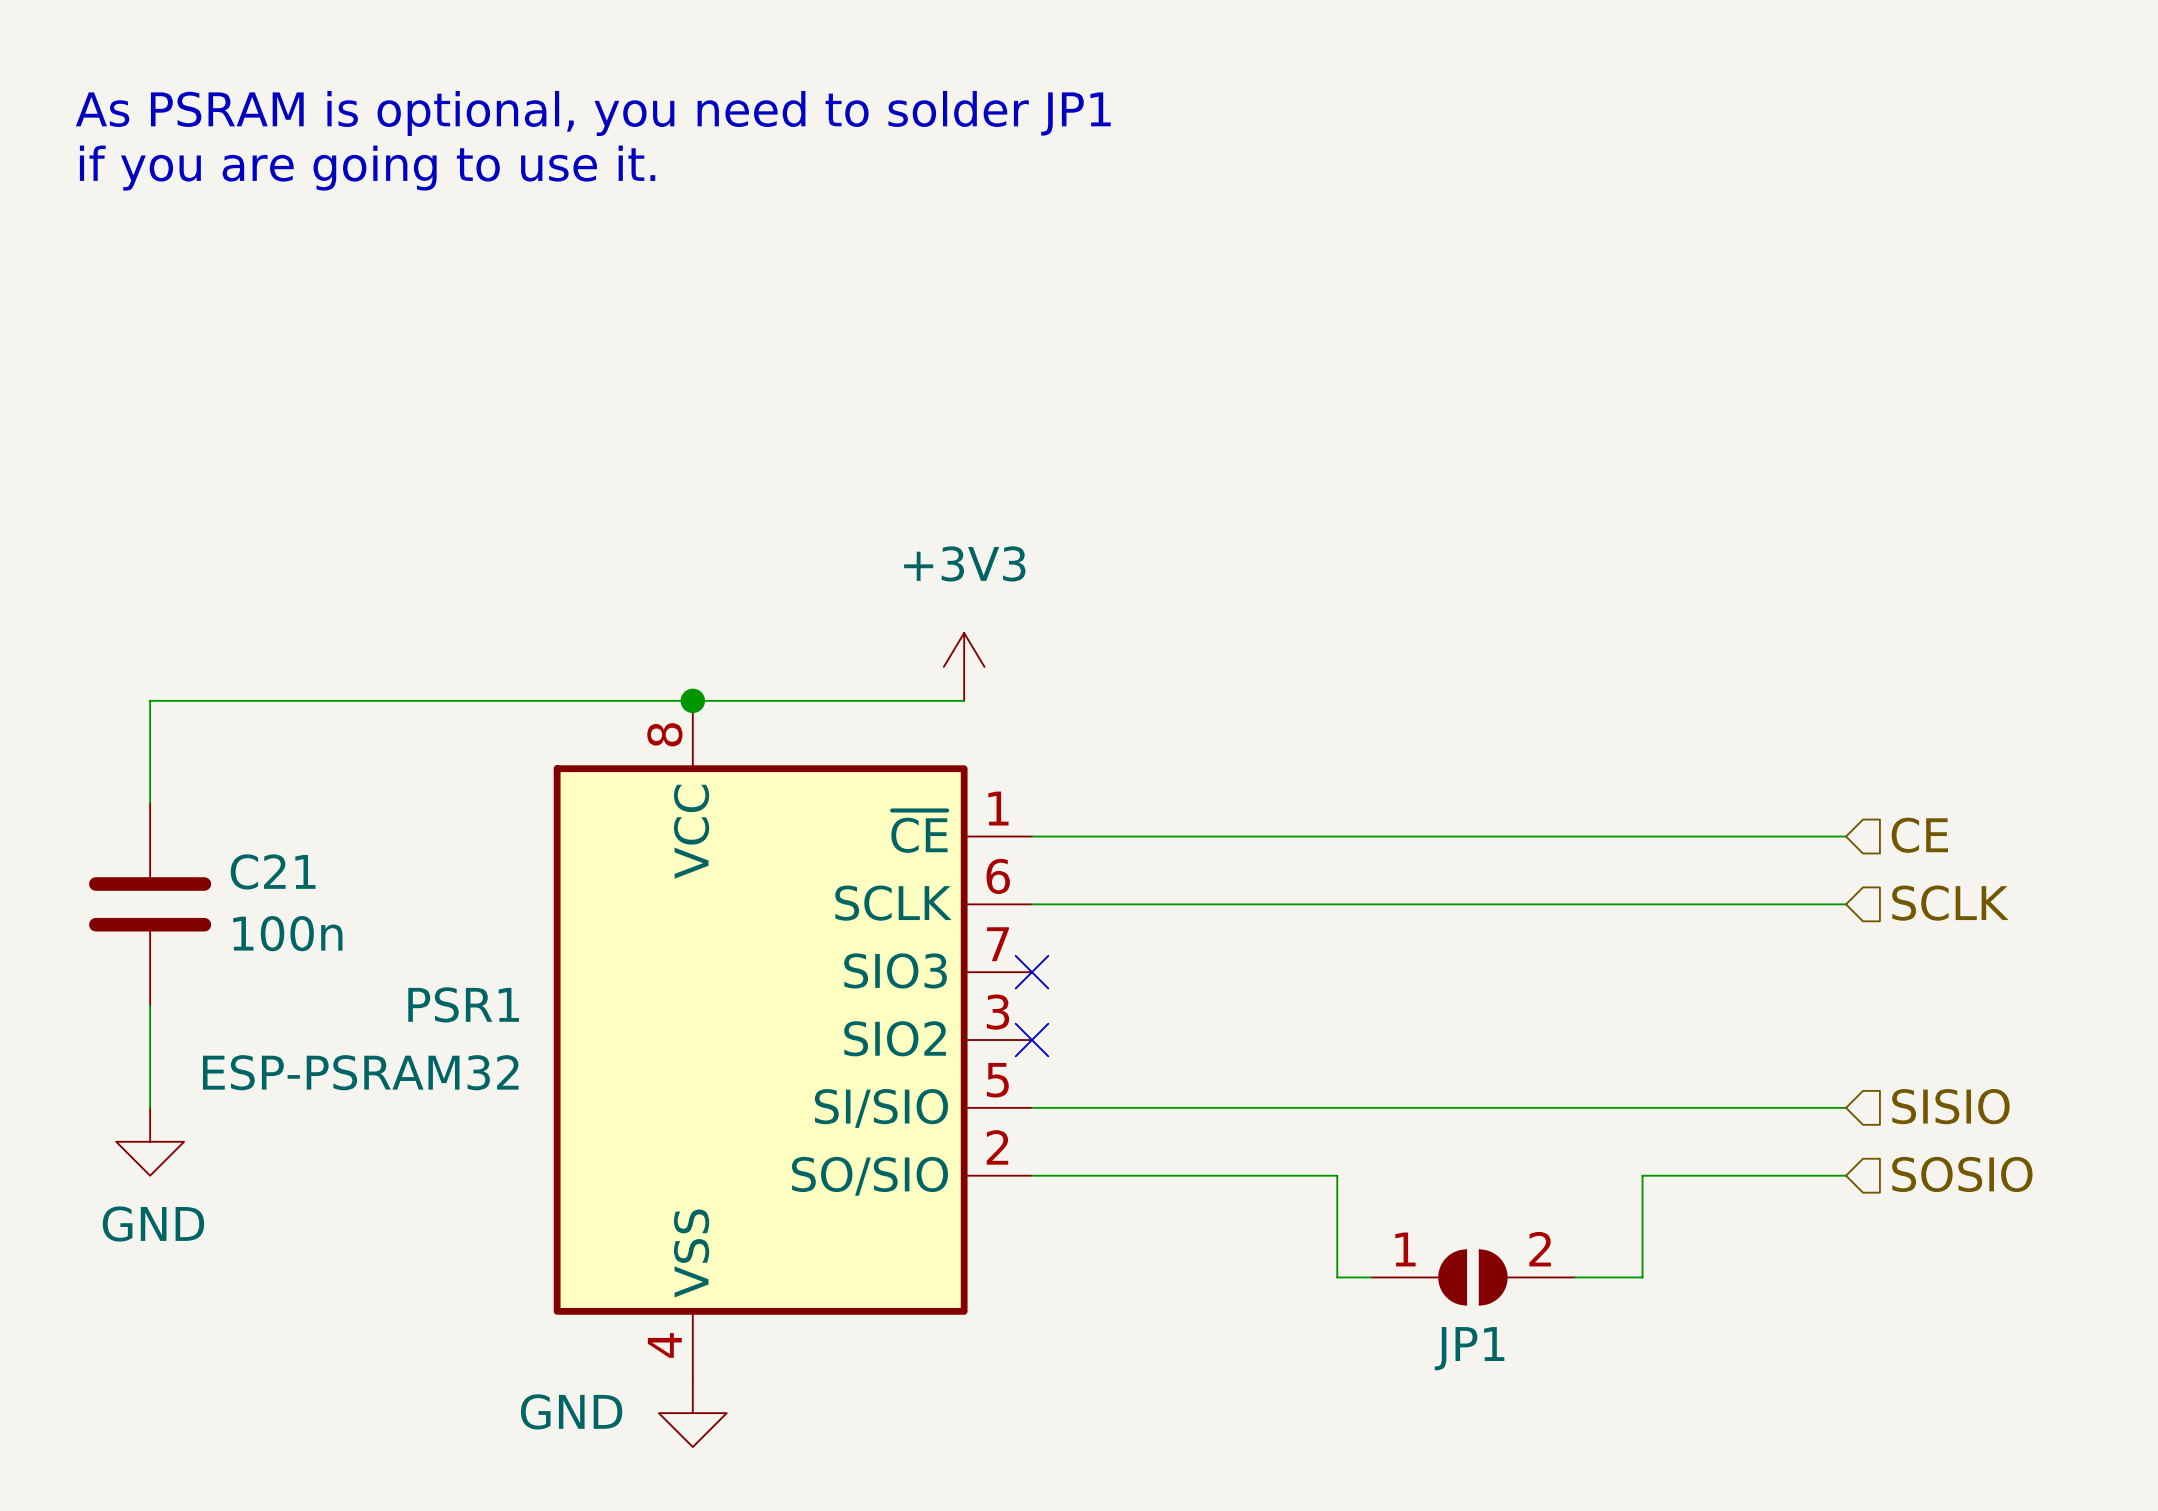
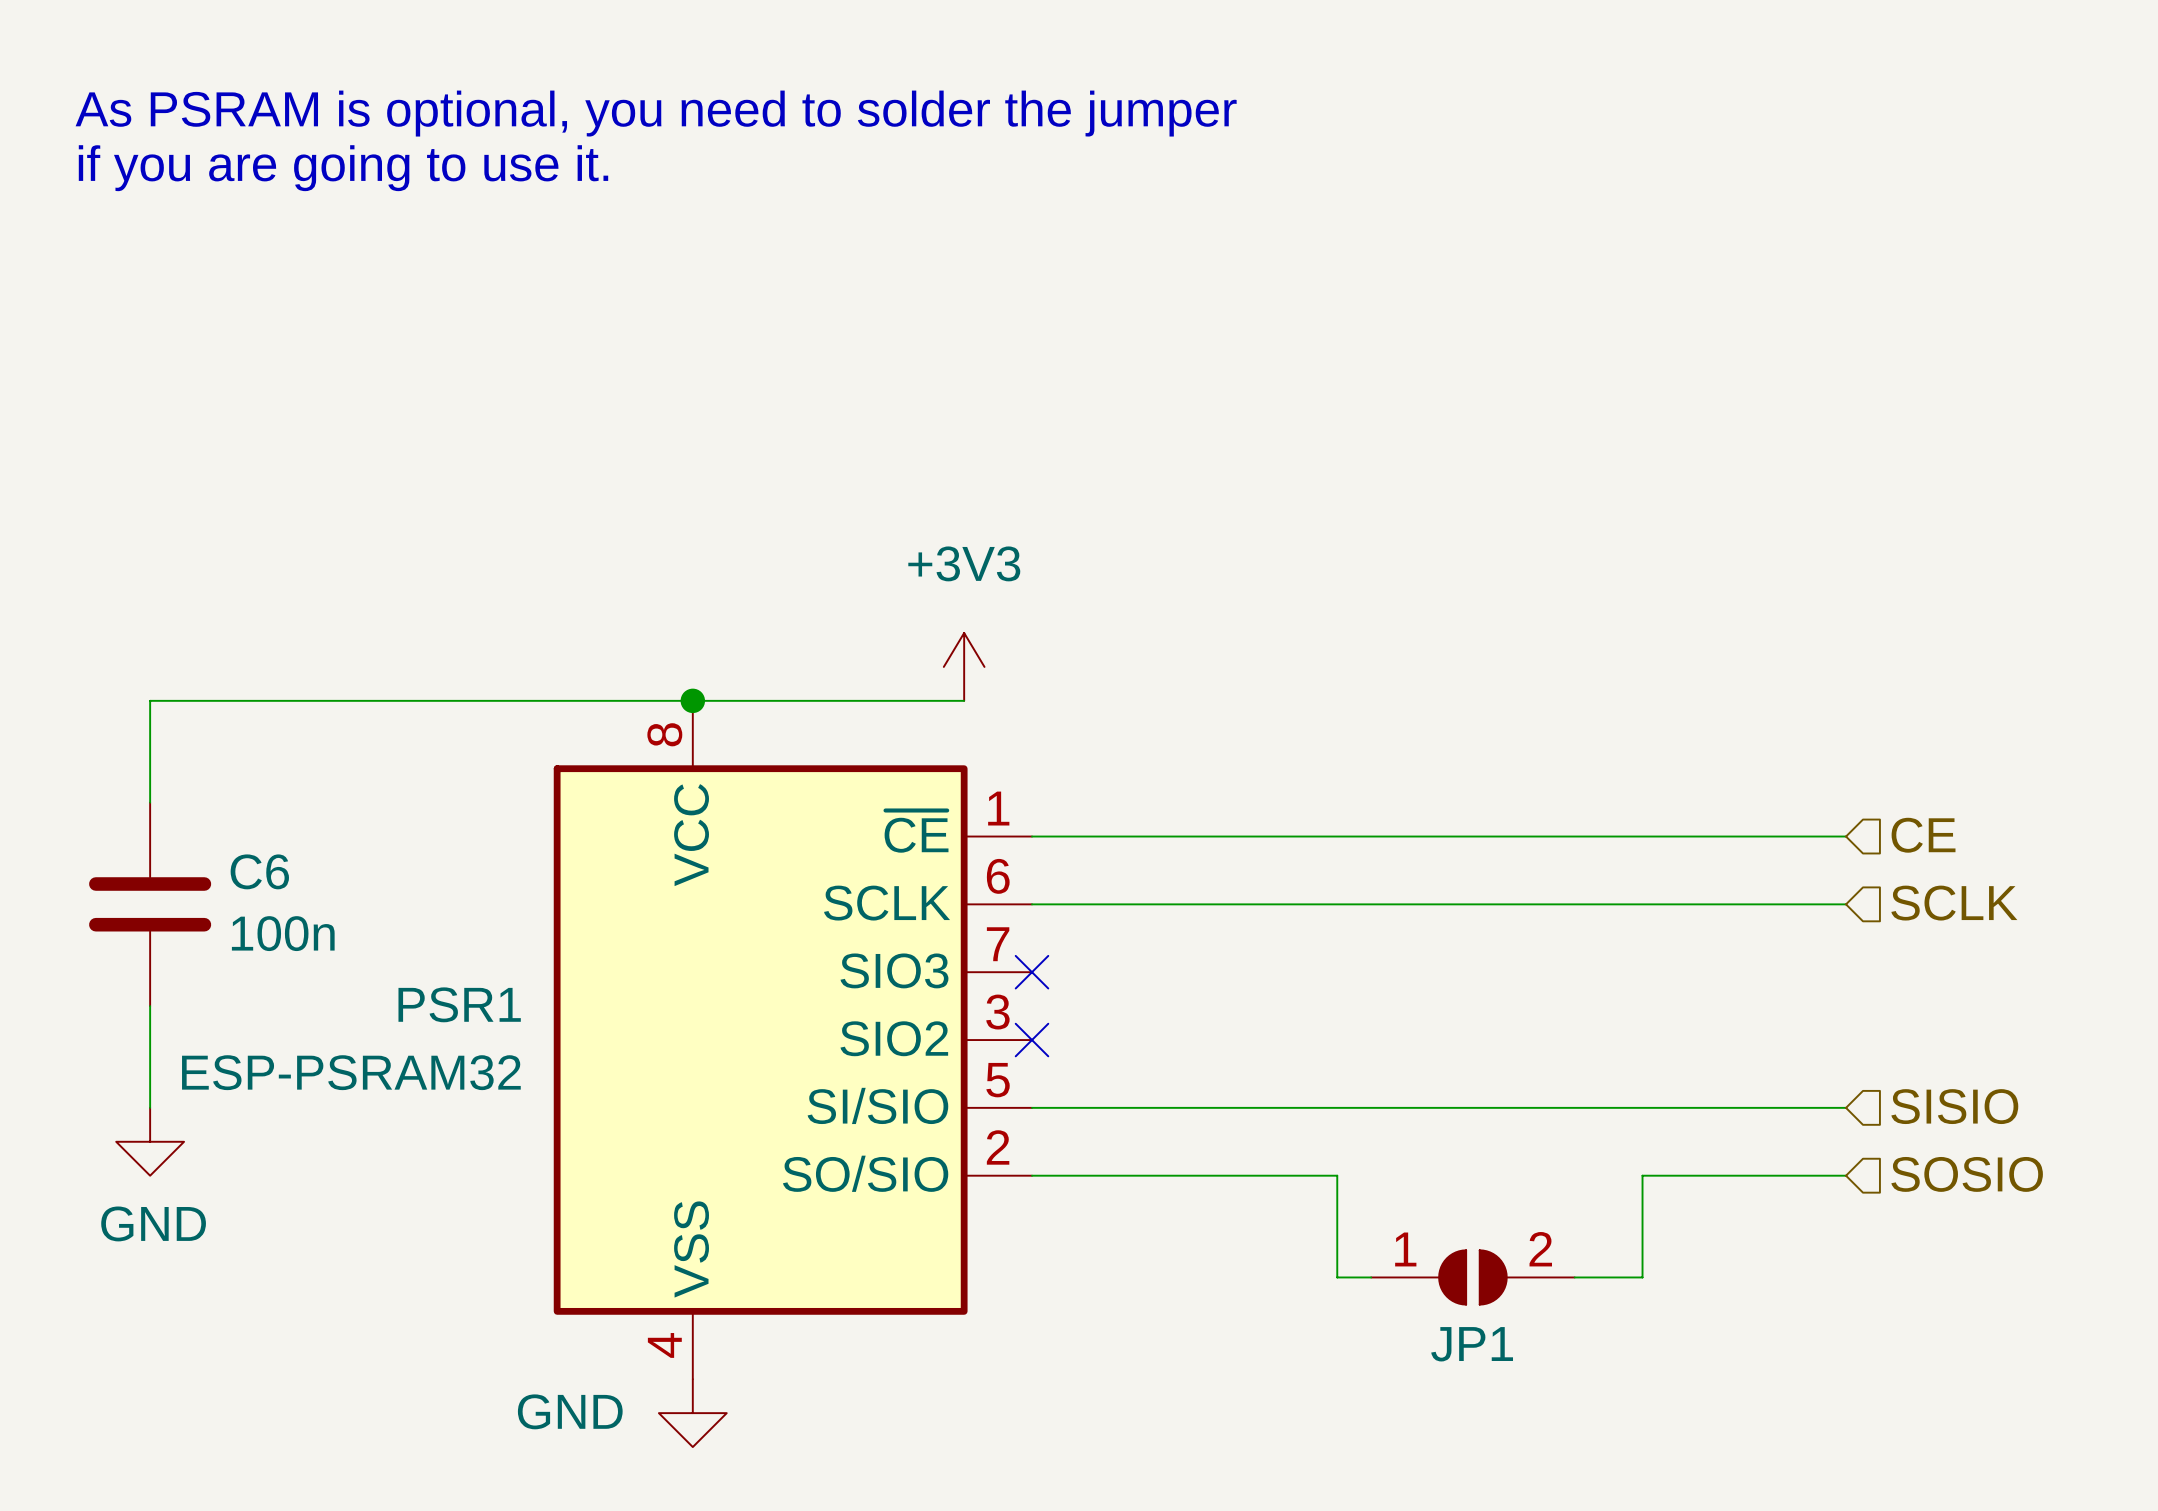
text: As PSRAM is optional, you need to solder JP1 (593, 113) -> As PSRAM is optional, you need to solder the jumper (656, 113)
C21 name: C21 (273, 871) -> C6 (259, 871)

